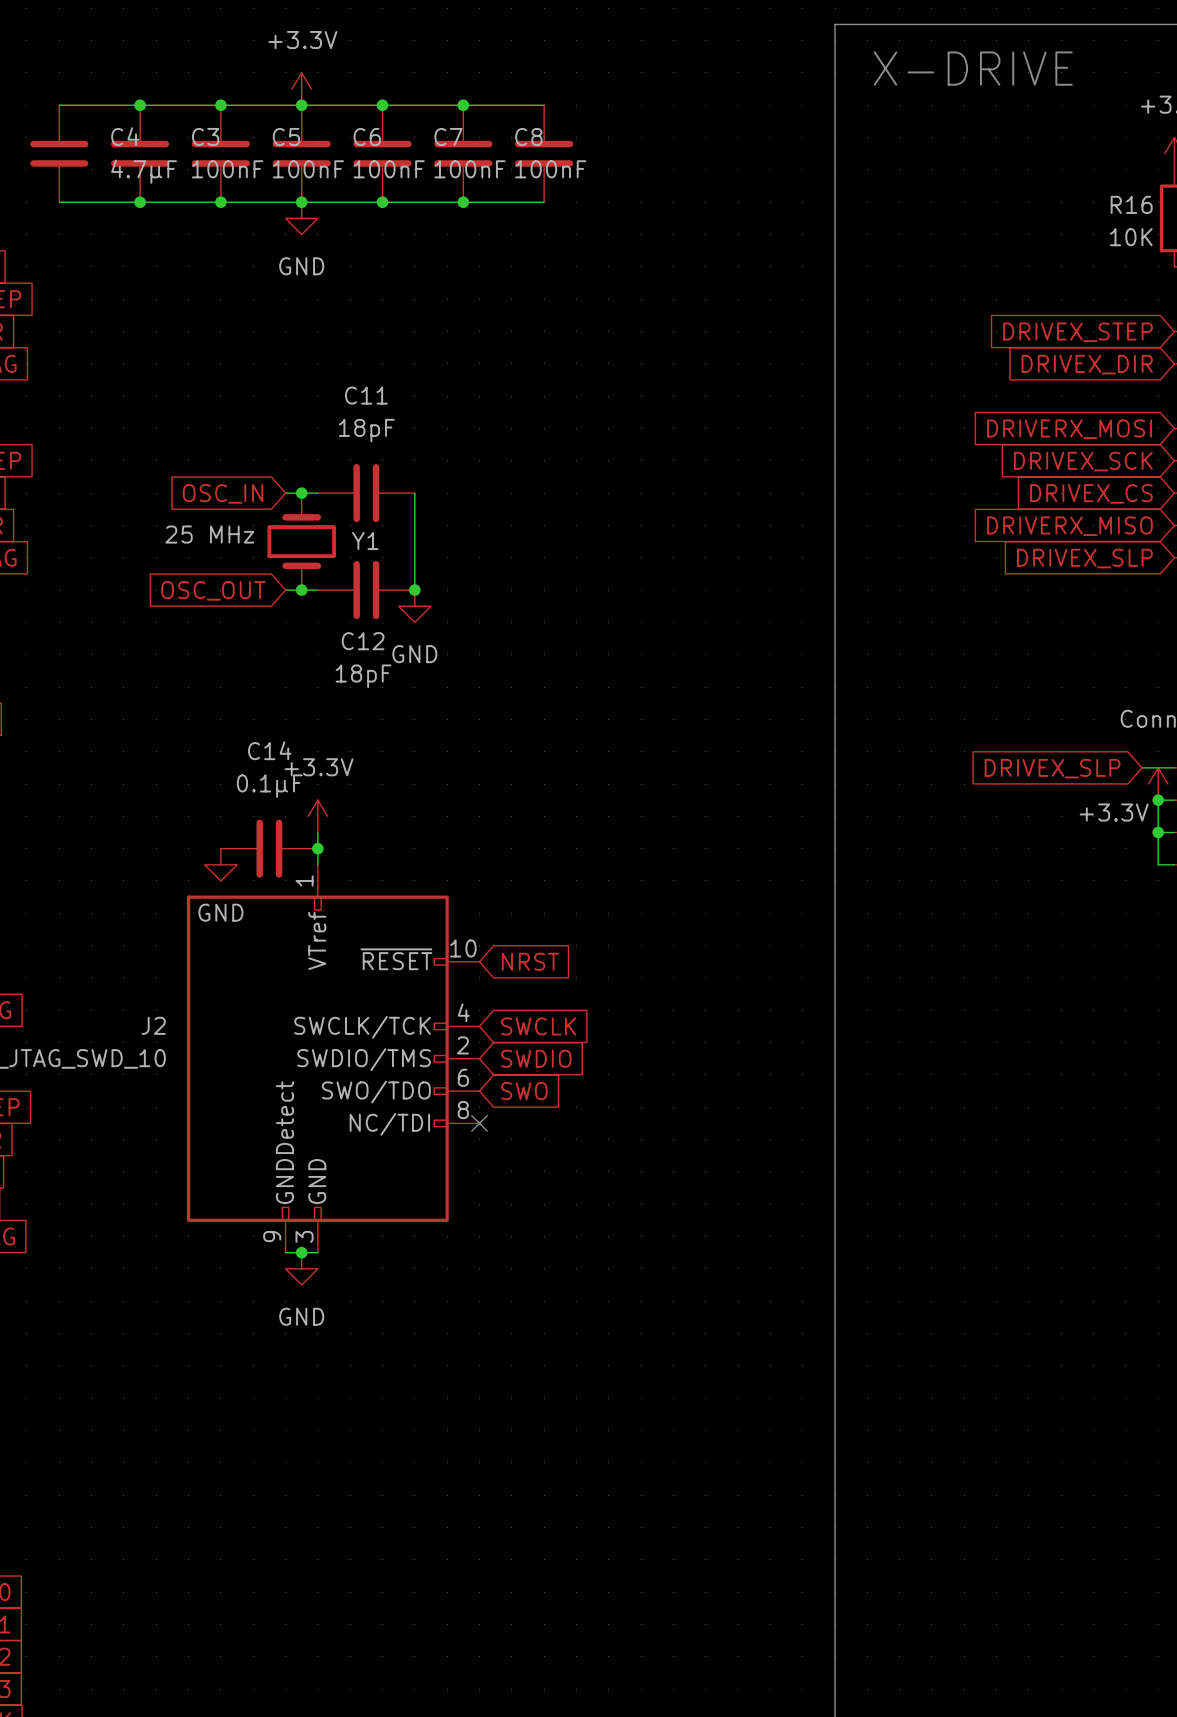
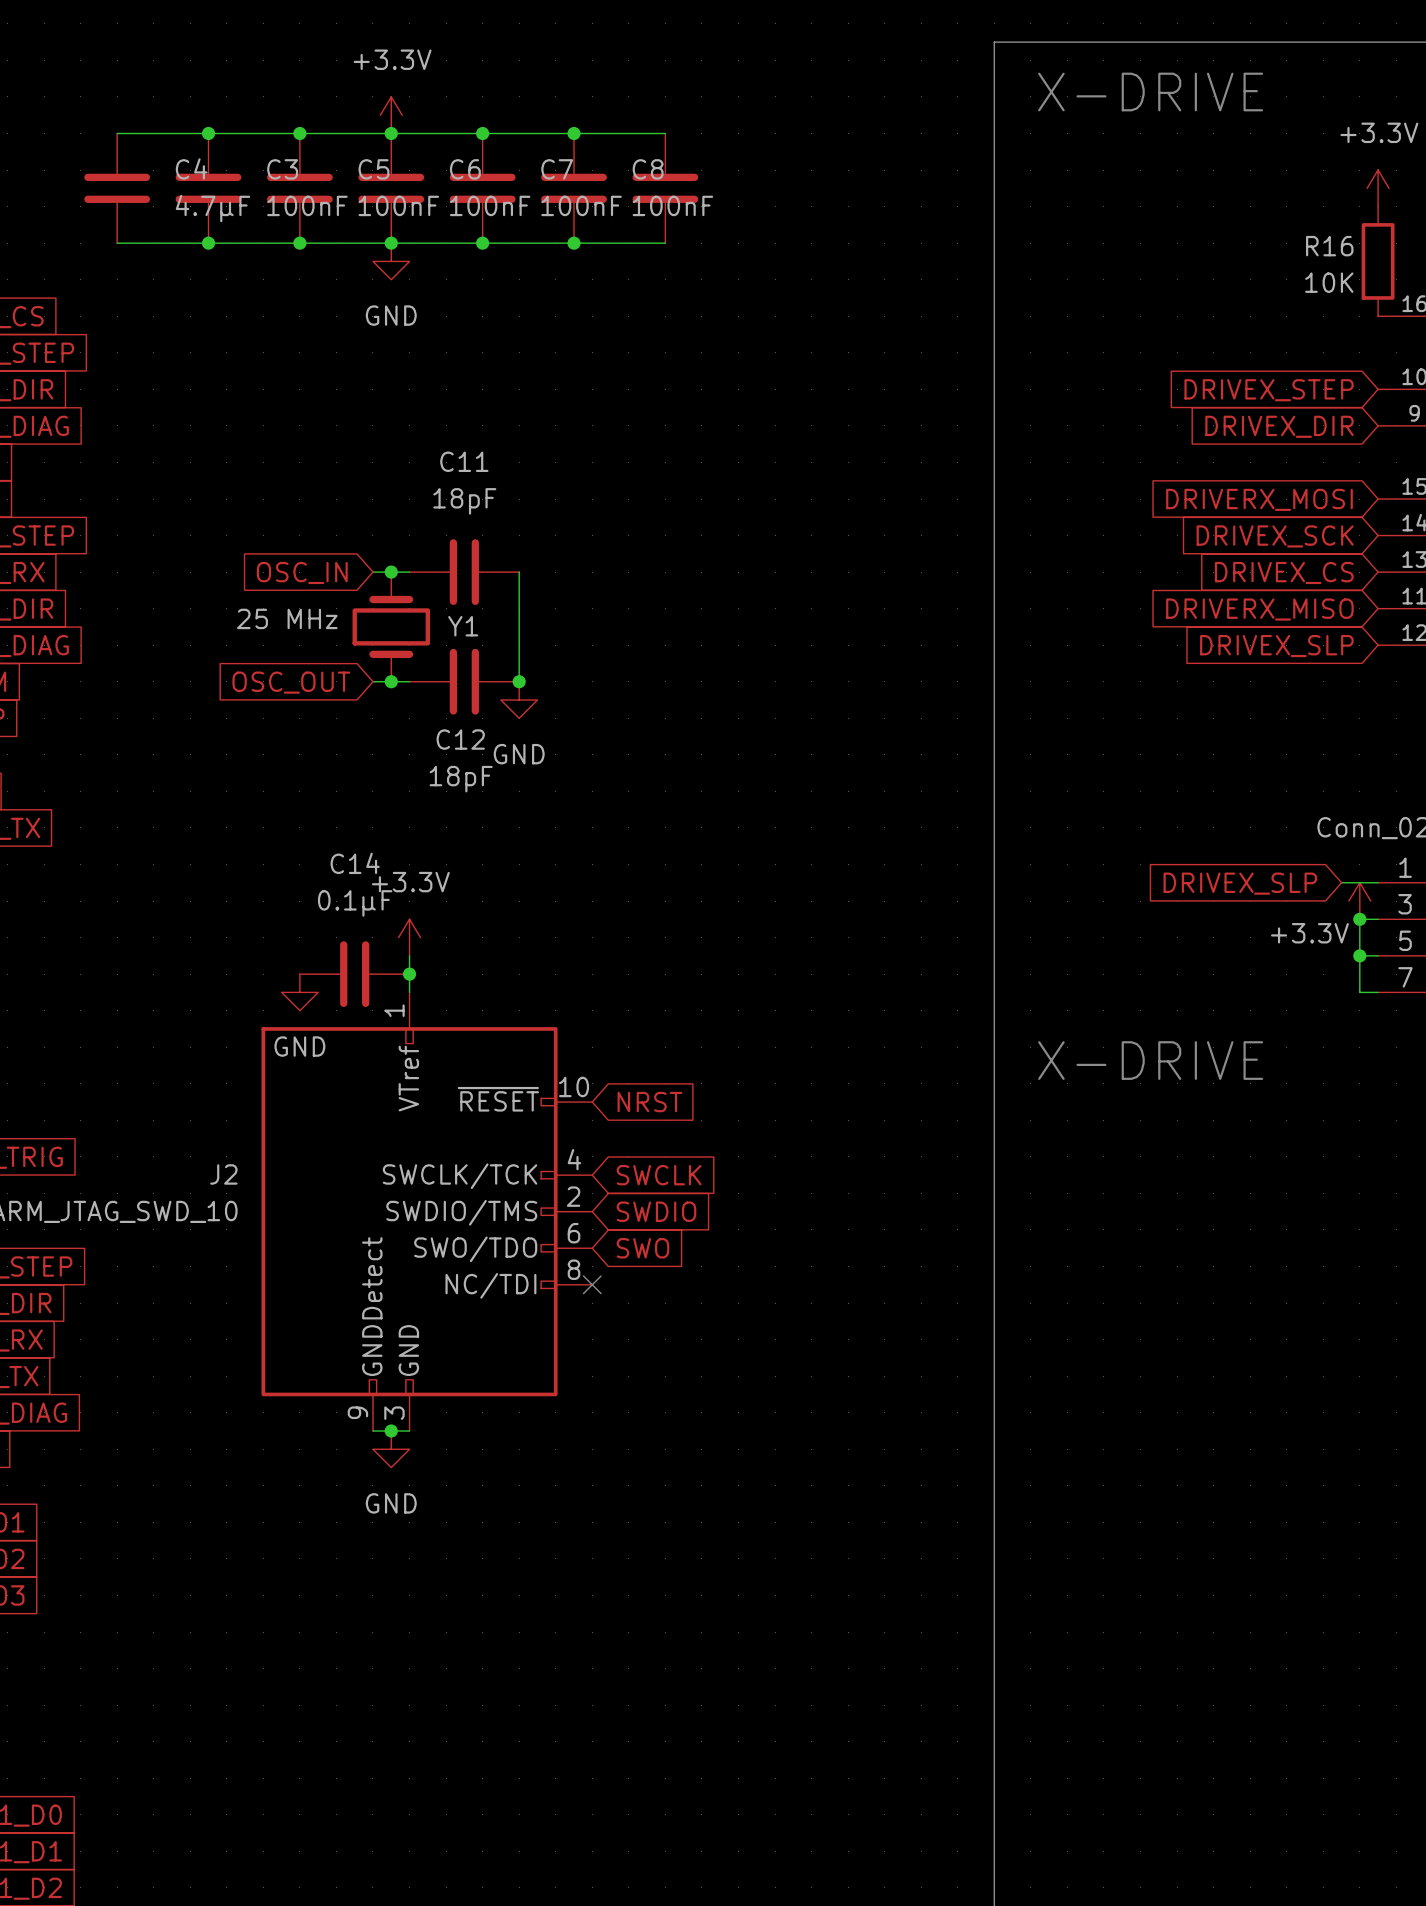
text: none -> X-DRIVE (1150, 1060)

